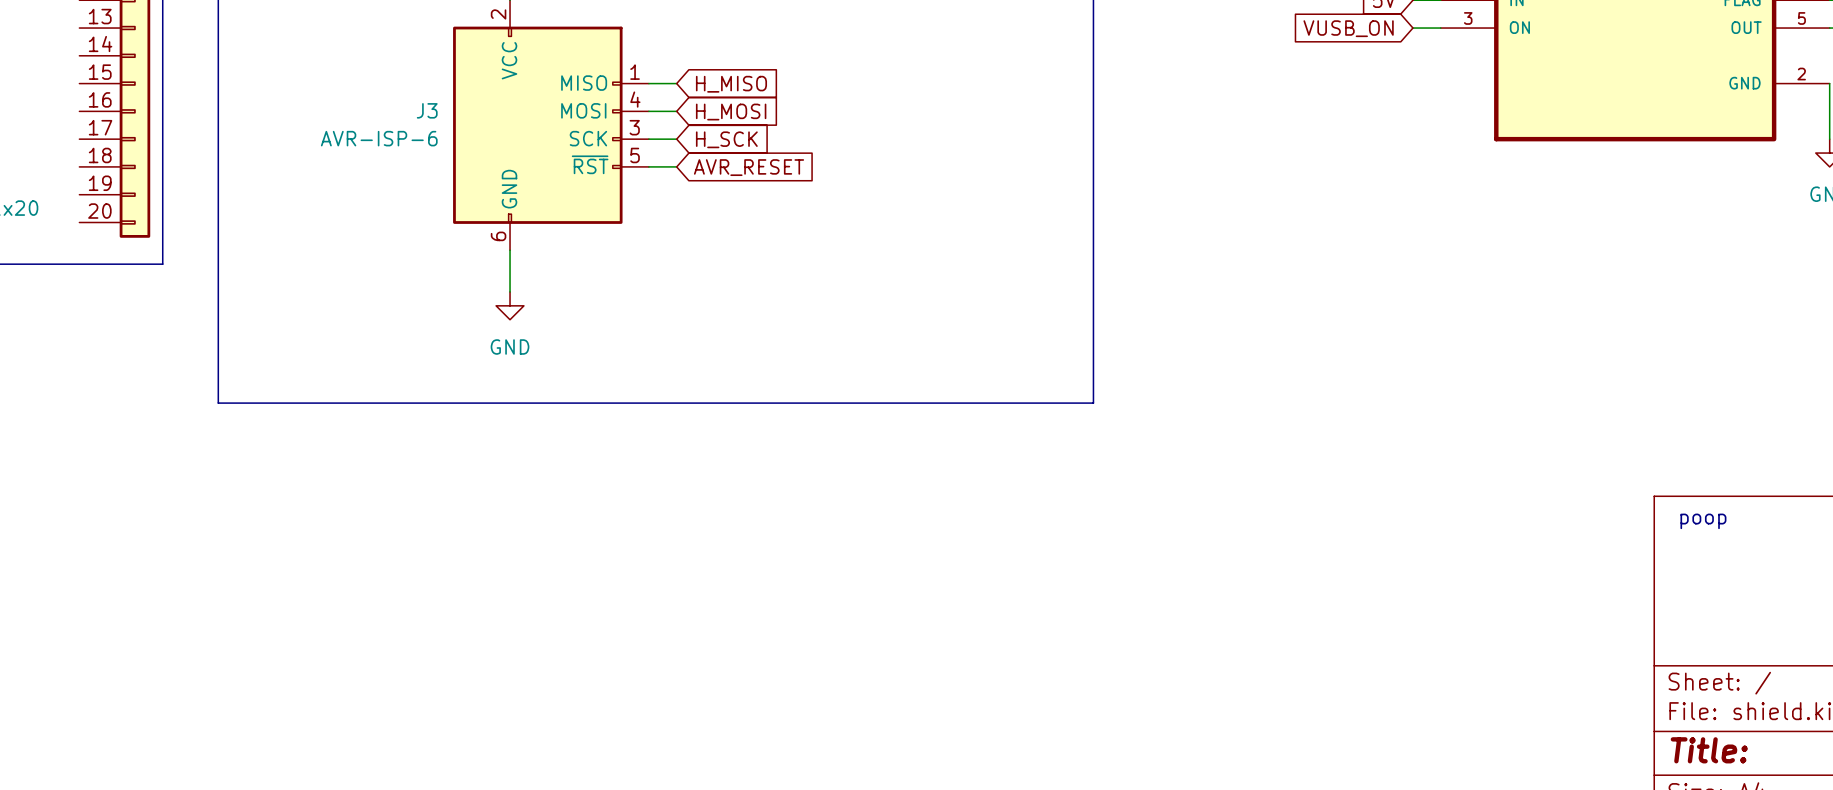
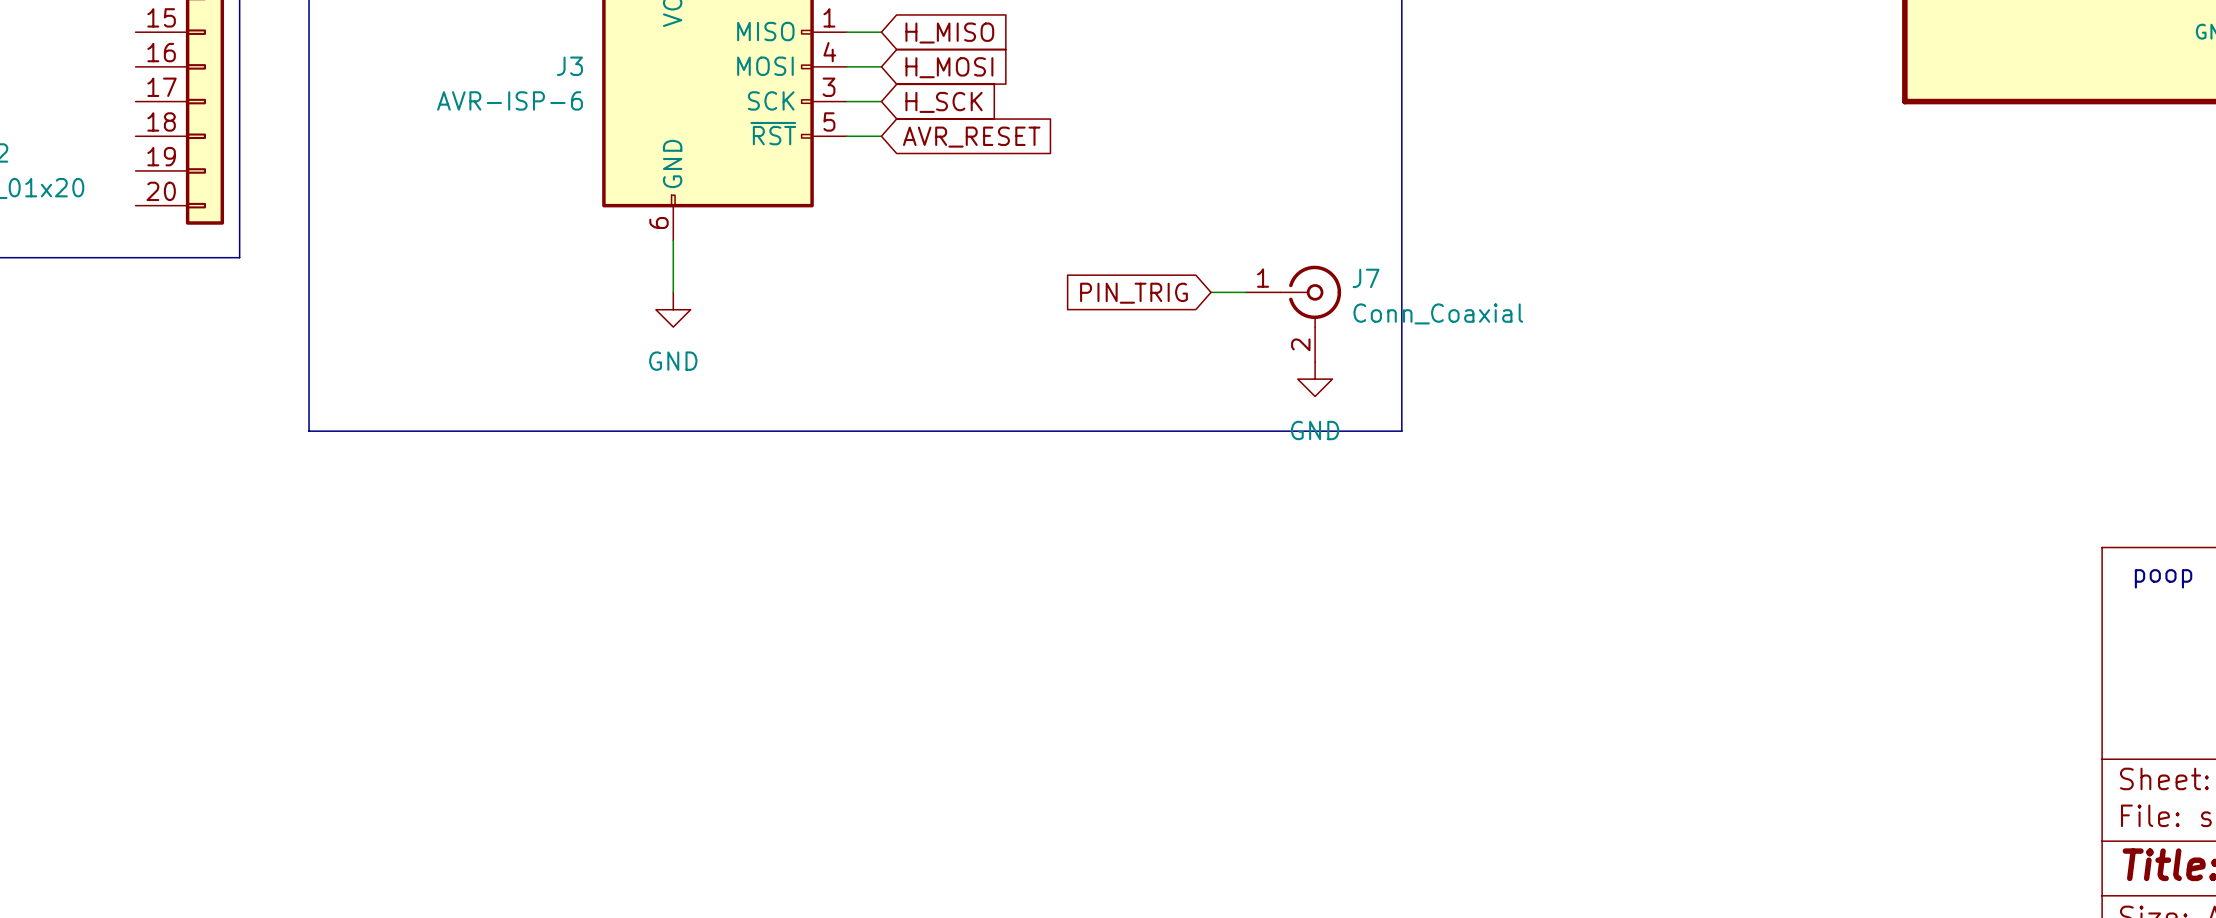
wire: none -> (1211, 292) (1245, 292)
global label: none -> PIN_TRIG (1133, 293)
J7: none -> Conn_Coaxial (1293, 313)
power symbol: none -> GND (1315, 379)

